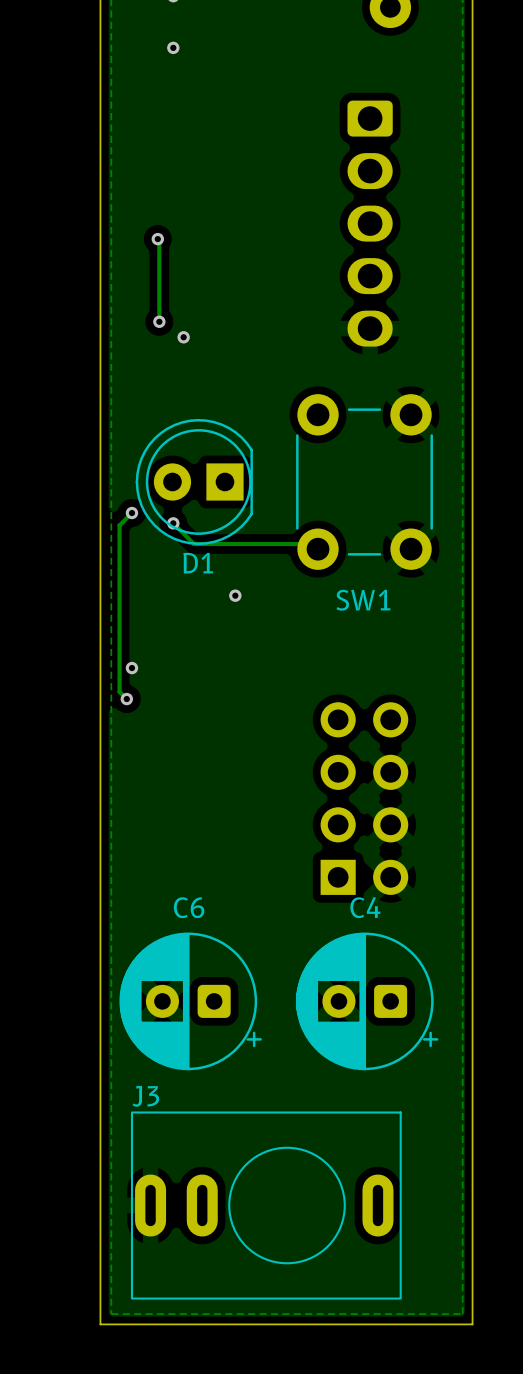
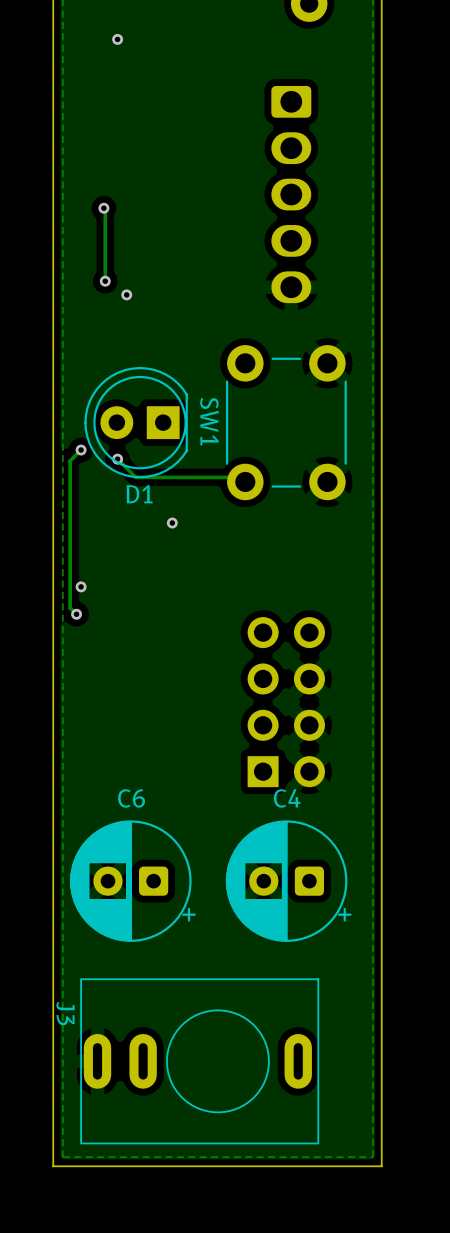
SW1 name rotation: 0° (363, 600) -> 90° clockwise (209, 421)
SW1 name position: SW1 (363, 600) -> SW1 (209, 421)
J3 name rotation: 0° (145, 1096) -> 90° clockwise (65, 1013)
J3 name position: J3 (145, 1096) -> J3 (65, 1013)

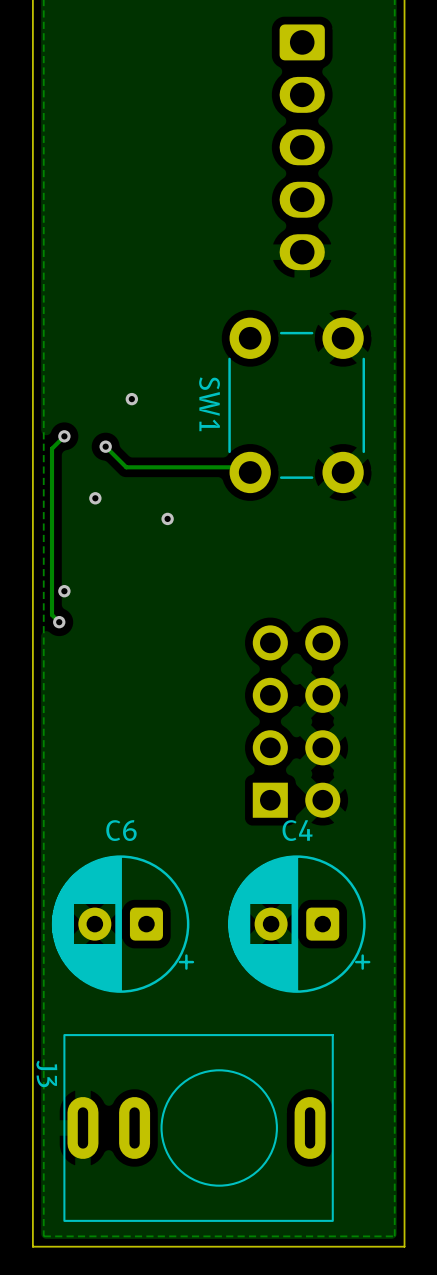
track: (103, 208) (105, 281) -> none
via: (103, 208) -> none
via: (105, 281) -> none
via: (126, 294) -> none
via: none -> (131, 399)
D1: (136, 422) -> none
via: none -> (95, 498)

